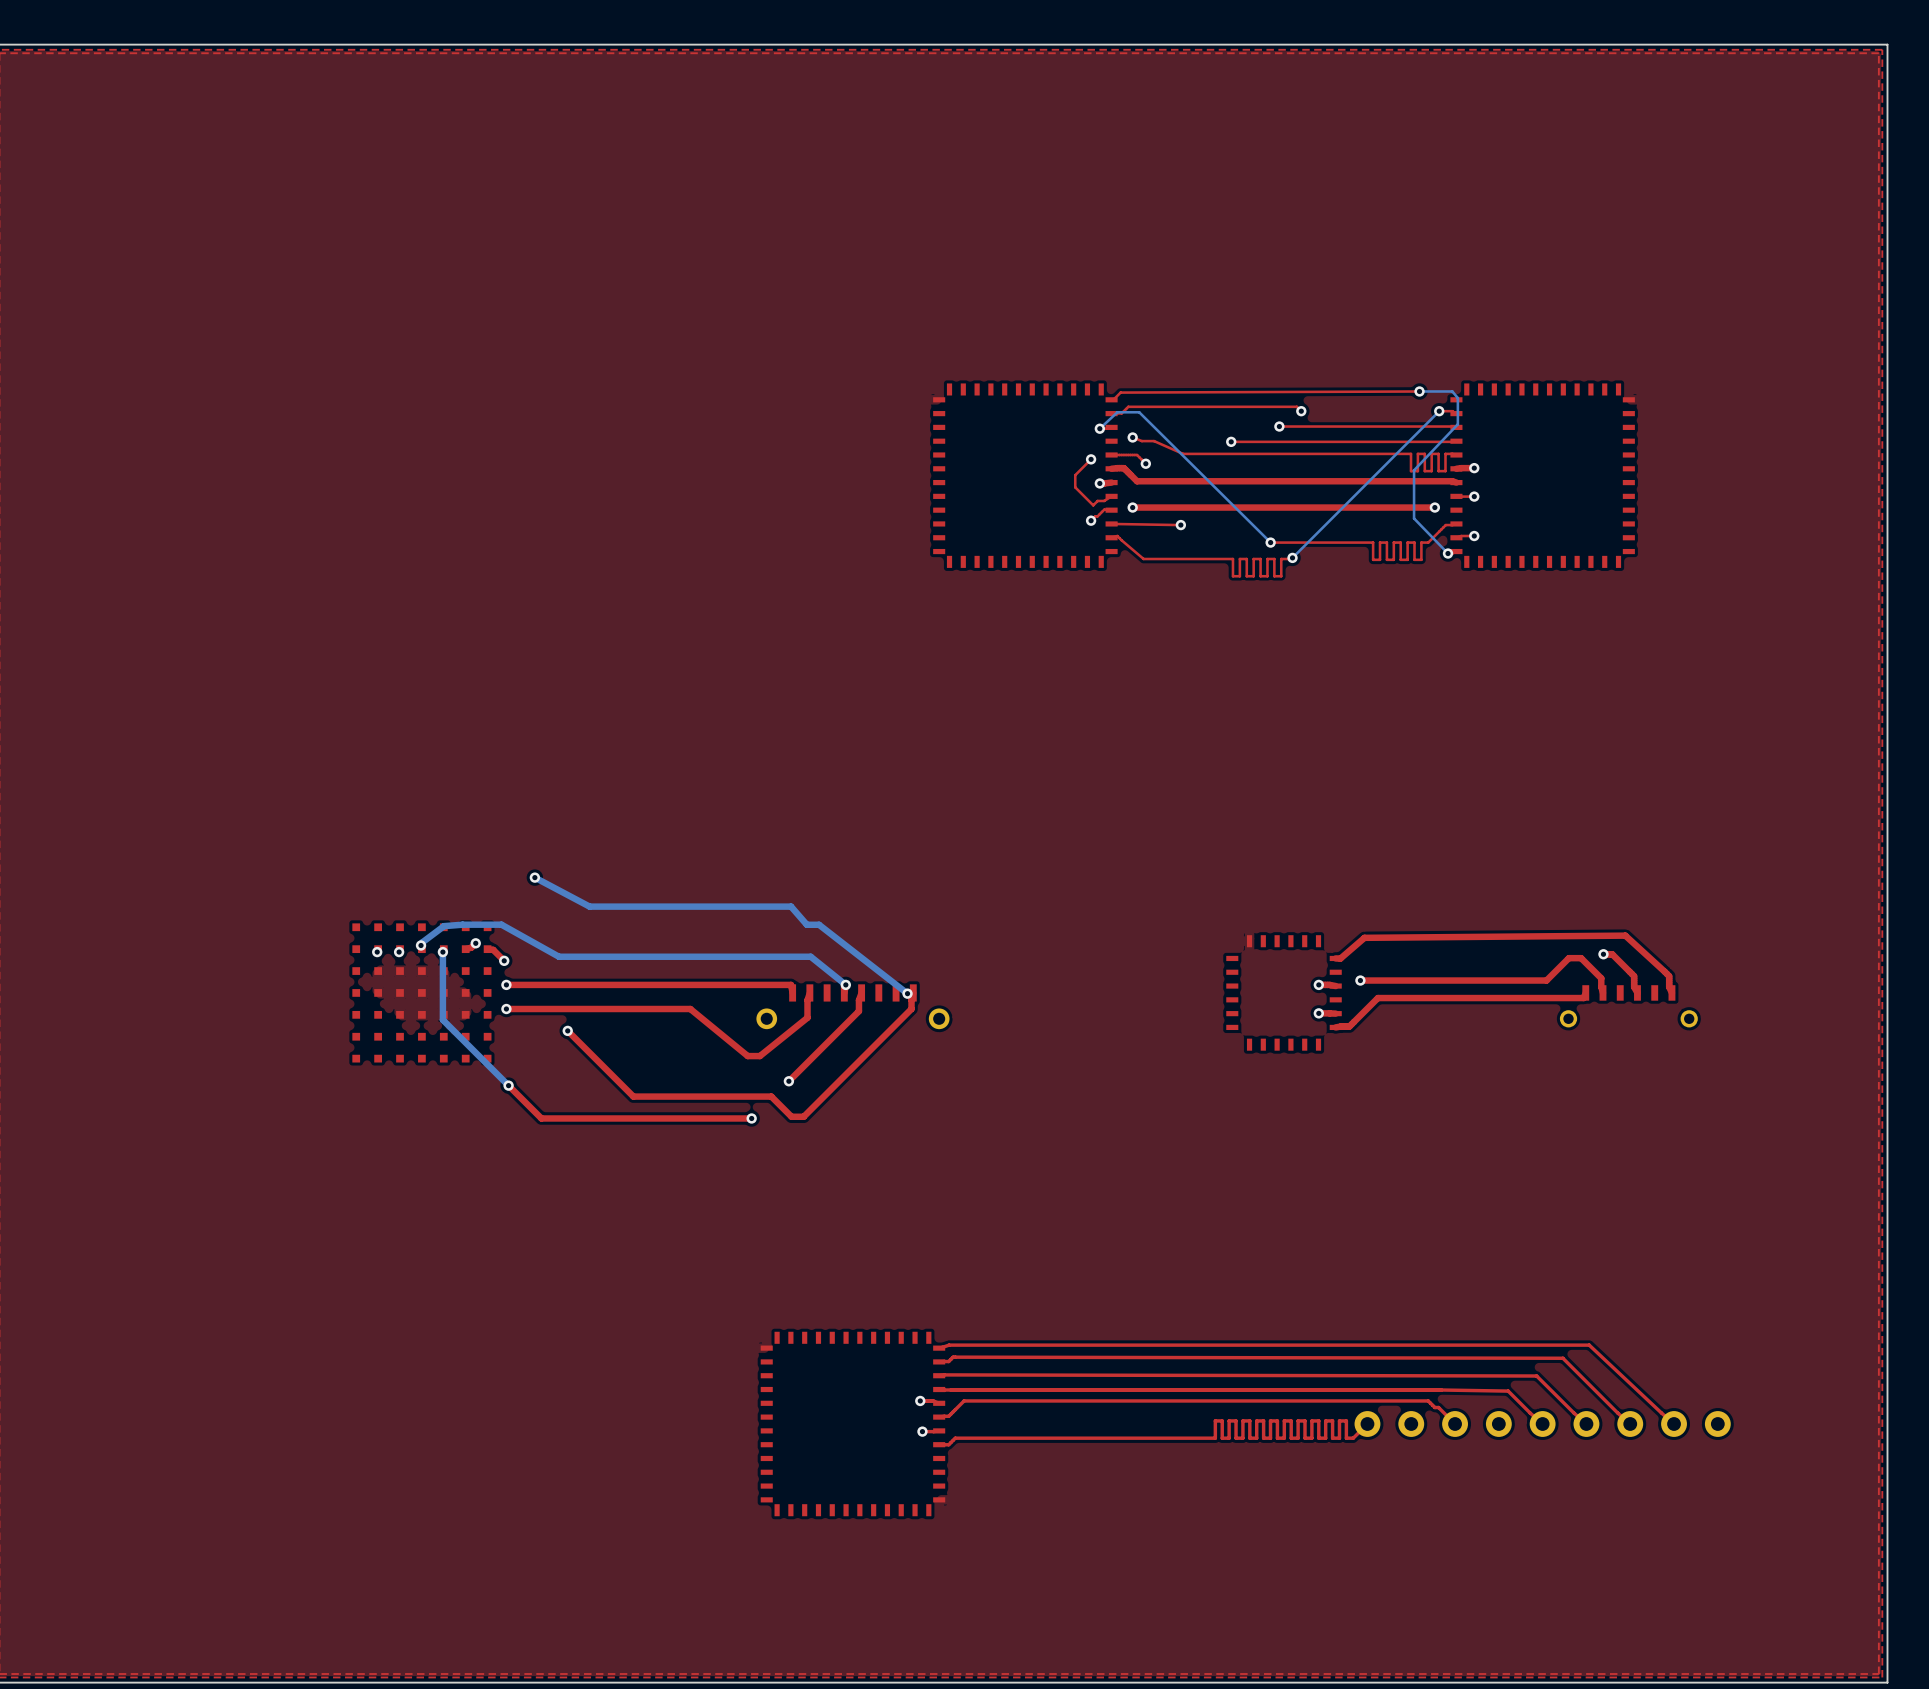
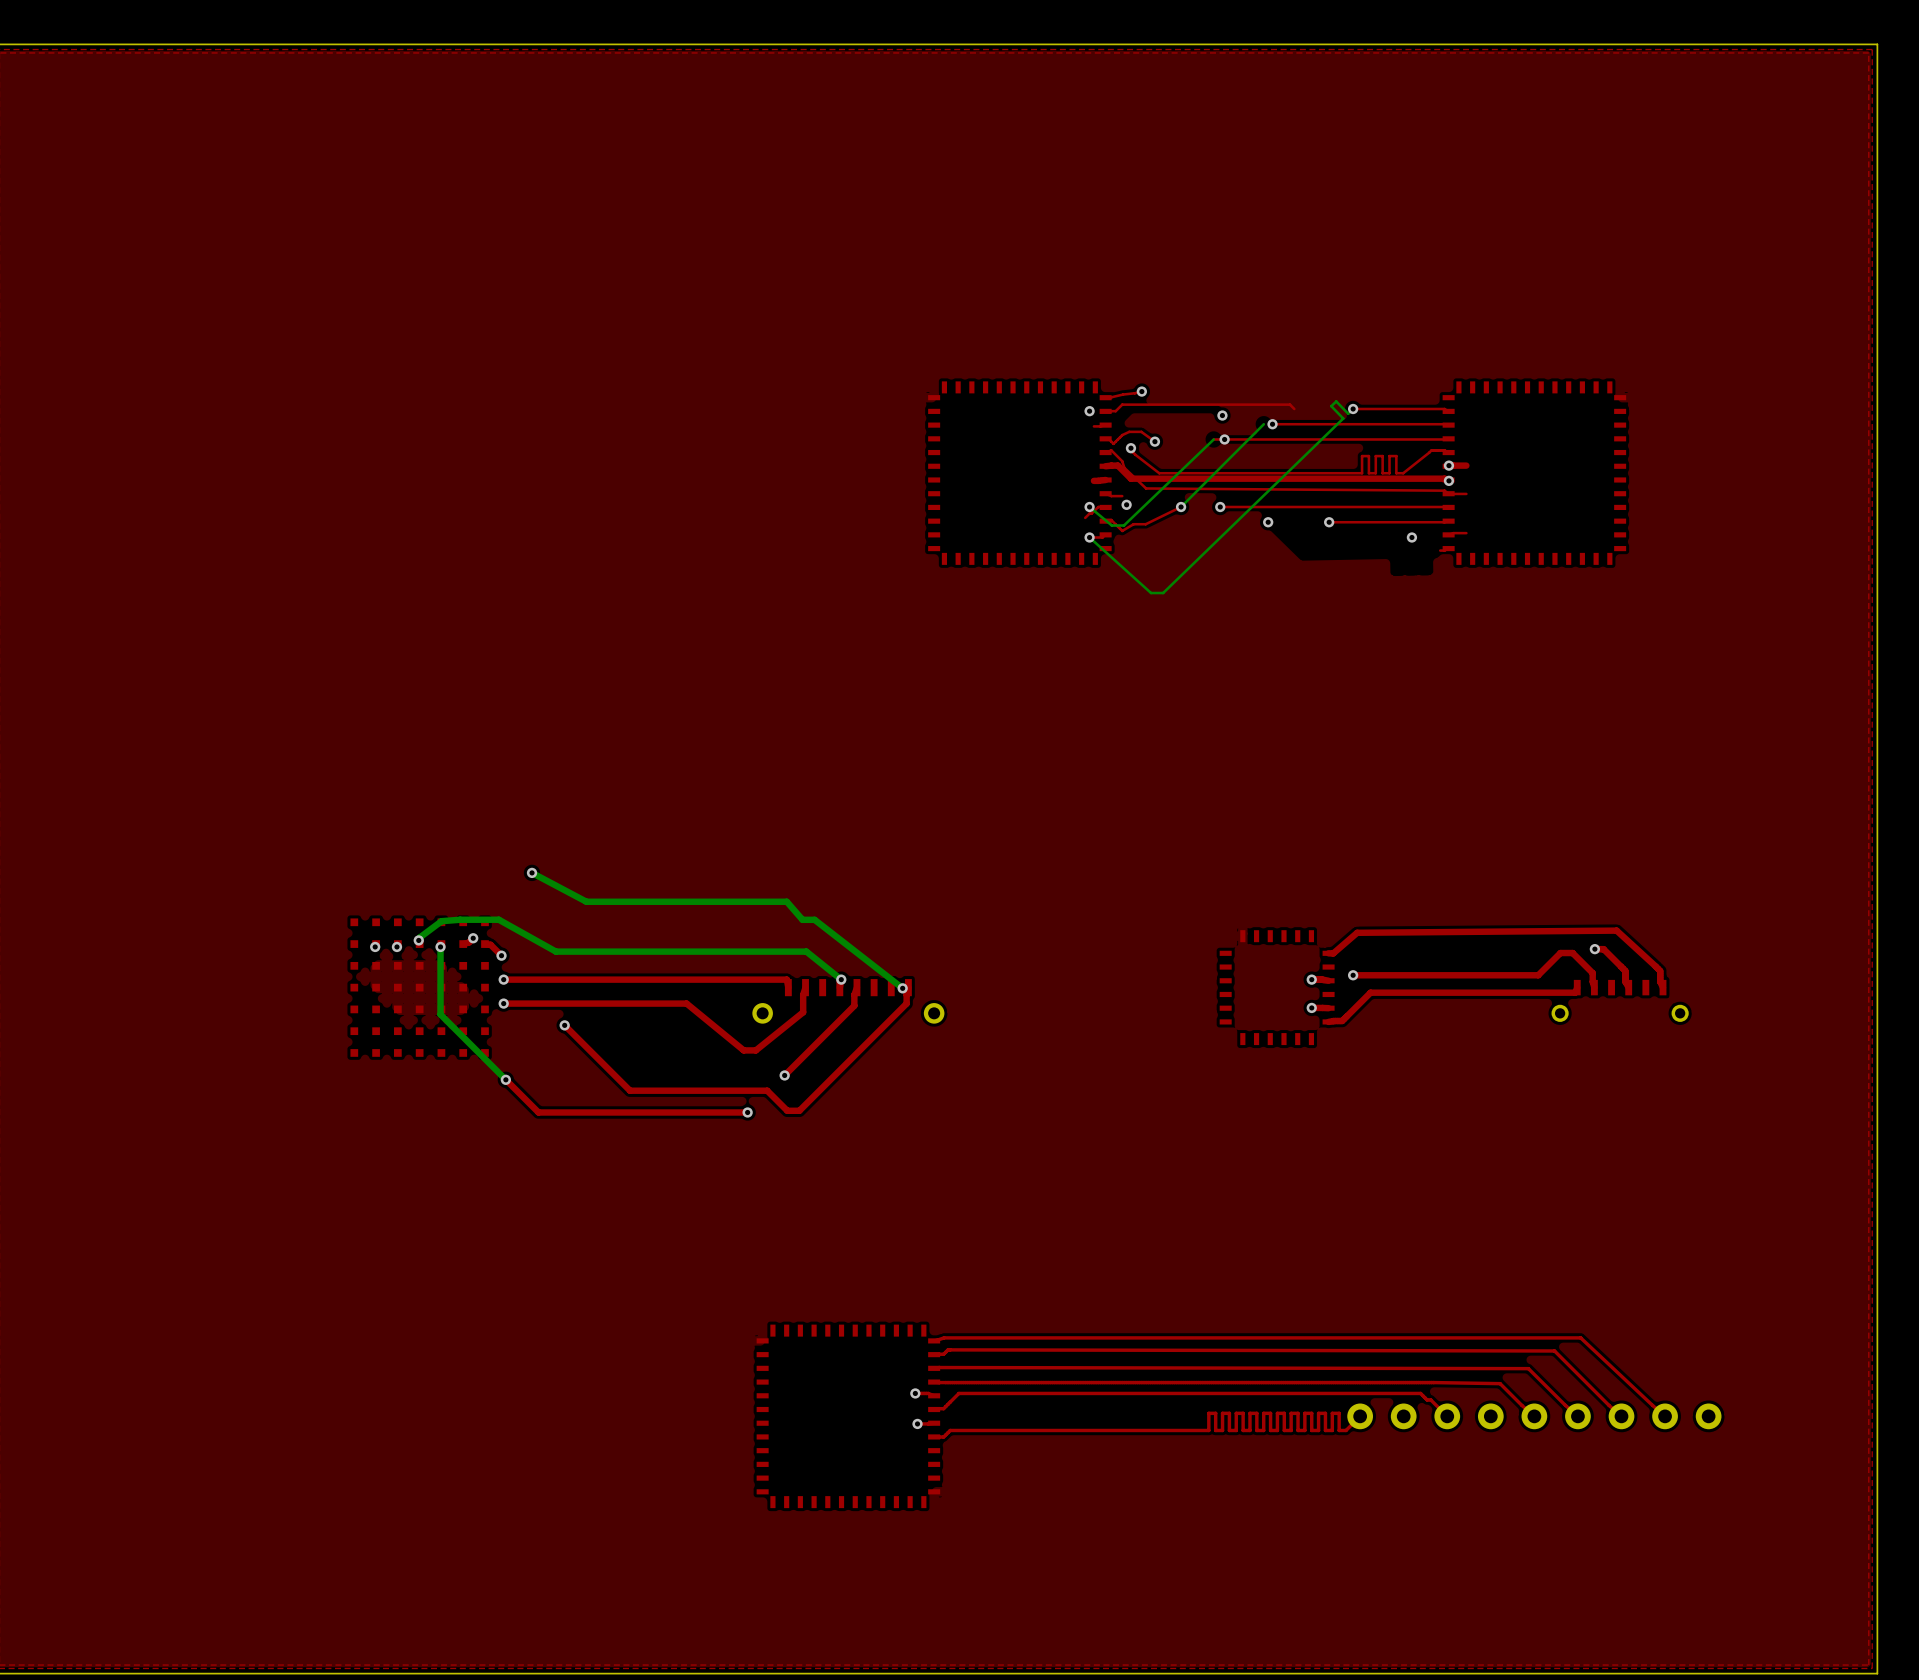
top track: (1419, 391) (1120, 392) (1111, 399) -> (1141, 391) (1105, 397)
bottom track: (1419, 391) (1452, 391) (1457, 398) (1457, 424) (1414, 470) (1414, 518) (1448, 553) -> none
via: (1419, 391) -> none
via: none -> (1141, 391)
via: (1301, 411) -> none
bottom track: none -> (1353, 408) (1348, 413) (1336, 401) (1331, 406) (1343, 418) (1163, 593) (1151, 593) (1089, 537)
via: none -> (1353, 408)
top track: none -> (1431, 408) (1353, 408)
bottom track: (1439, 411) (1292, 557) -> none
via: (1439, 411) -> none
via: none -> (1222, 415)
bottom track: none -> (1263, 424) (1181, 507)
bottom track: (1099, 428) (1117, 412) (1139, 412) (1270, 542) -> none
via position: (1099, 428) -> (1089, 411)
top track: (1132, 437) (1141, 441) (1154, 441) (1183, 453) (1411, 453) (1411, 471) (1417, 471) (1417, 453) (1424, 453) (1424, 471) (1431, 471) (1431, 453) (1438, 453) (1438, 471) (1445, 471) (1445, 453) (1456, 454) -> (1130, 448) (1135, 454) (1159, 473) (1362, 473) (1362, 456) (1368, 456) (1368, 473) (1375, 473) (1375, 456) (1382, 456) (1382, 473) (1389, 473) (1389, 456) (1396, 456) (1396, 473) (1403, 473) (1431, 450) (1444, 450) (1448, 452)
via: (1132, 437) -> none
top track: none -> (1105, 438) (1113, 443) (1122, 435) (1129, 431) (1141, 431) (1154, 441)
bottom track: none -> (1213, 439) (1123, 525) (1111, 525) (1089, 507)
top track: none -> (1224, 439) (1213, 439)
via: none -> (1154, 441)
via: none -> (1130, 448)
top track: (1111, 454) (1137, 454) (1145, 463) -> (1105, 452) (1111, 450) (1122, 461) (1124, 467) (1146, 488) (1444, 490) (1448, 493)
top track: (1091, 459) (1075, 475) (1075, 487) (1093, 505) (1097, 500) (1104, 500) (1111, 496) -> (1122, 496) (1111, 496) (1105, 493)
via: (1091, 459) -> none
via: (1145, 463) -> none
via: none -> (1448, 465)
via: (1474, 468) -> none
via: (1099, 483) -> none
via: none -> (1448, 480)
via: (1474, 496) -> none
top track: (1434, 507) (1132, 507) -> none
via: (1434, 507) -> none
via: none -> (1089, 507)
top track: none -> (1220, 507) (1448, 507)
via: none -> (1220, 507)
via: (1091, 520) -> none
top track: (1111, 523) (1180, 525) -> (1105, 521) (1111, 520) (1122, 530) (1133, 524) (1145, 524) (1181, 507)
via position: (1180, 525) -> (1181, 507)
via: none -> (1329, 522)
top track: (1445, 525) (1428, 542) (1421, 542) (1421, 559) (1414, 559) (1414, 542) (1407, 542) (1407, 559) (1400, 559) (1400, 542) (1393, 542) (1393, 559) (1386, 559) (1386, 542) (1380, 542) (1380, 559) (1373, 559) (1373, 542) (1270, 542) -> (1438, 522) (1329, 522)
via: (1474, 536) -> none
top track: (1111, 537) (1117, 536) (1143, 559) (1232, 559) (1232, 576) (1239, 576) (1239, 559) (1246, 559) (1246, 576) (1253, 576) (1253, 559) (1260, 559) (1260, 576) (1267, 576) (1267, 559) (1274, 559) (1274, 576) (1281, 576) (1281, 559) (1292, 557) -> (1105, 534) (1102, 537) (1089, 537)
via: none -> (1089, 537)
via: none -> (1411, 537)
via position: (1270, 542) -> (1268, 522)
via: (1448, 553) -> none
via: (1292, 557) -> none

